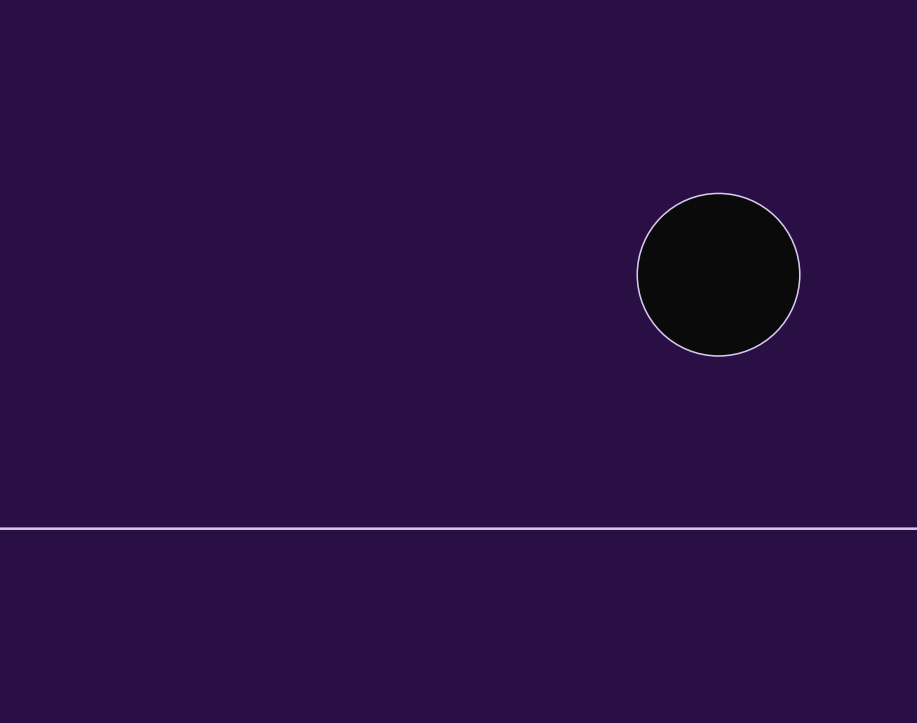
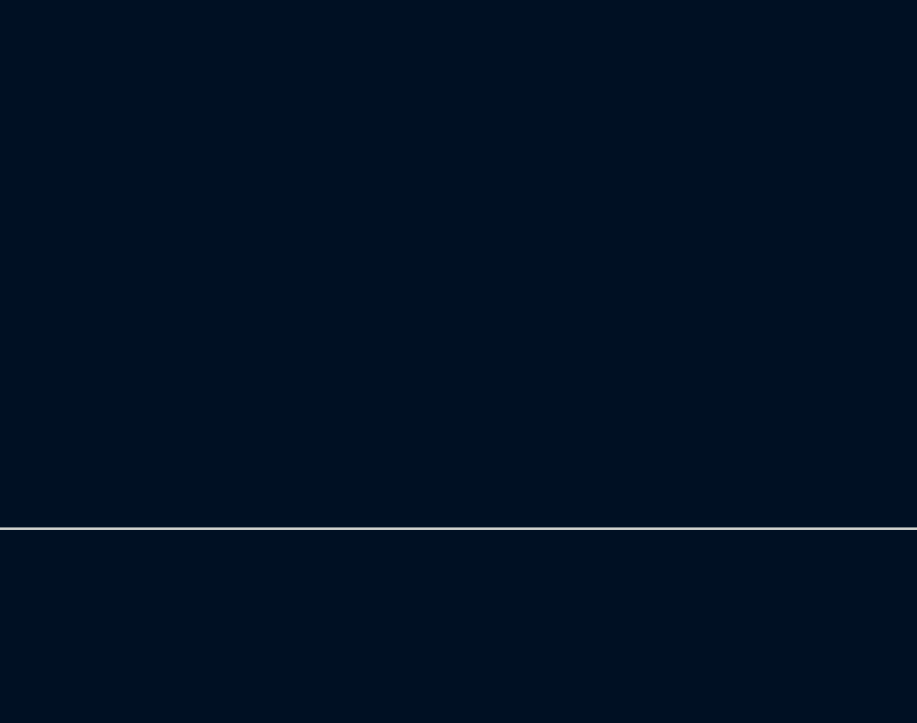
part: (718, 274) -> none

